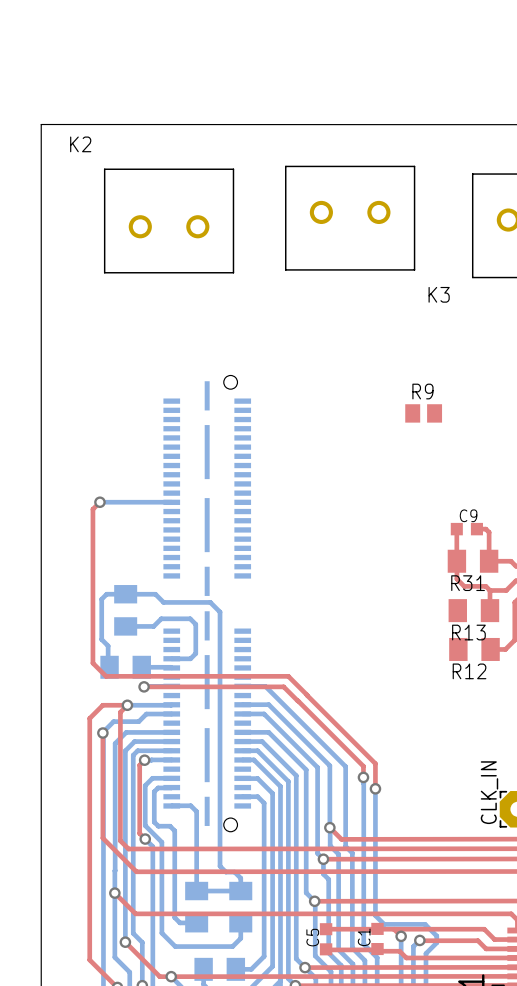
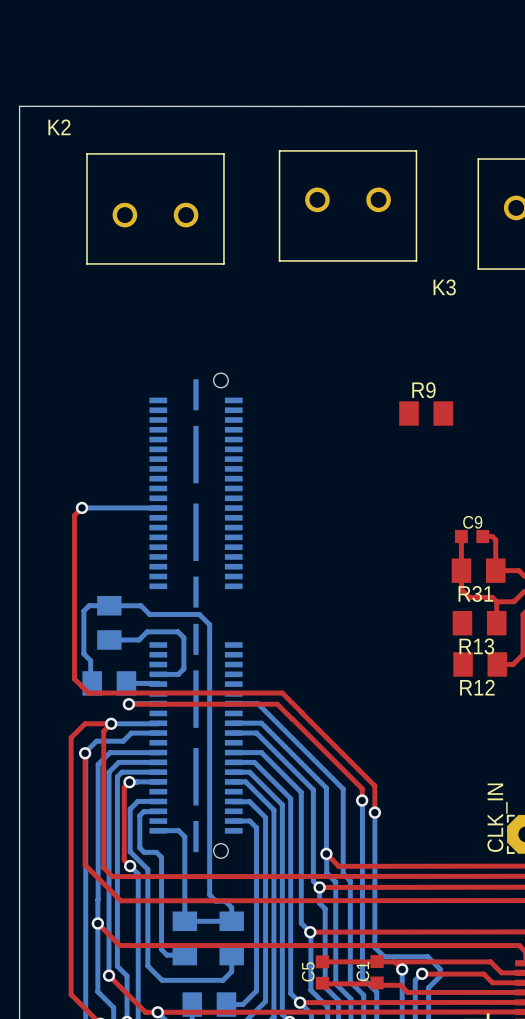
R9 footprint: [405, 404, 443, 423] -> [399, 401, 454, 426]

